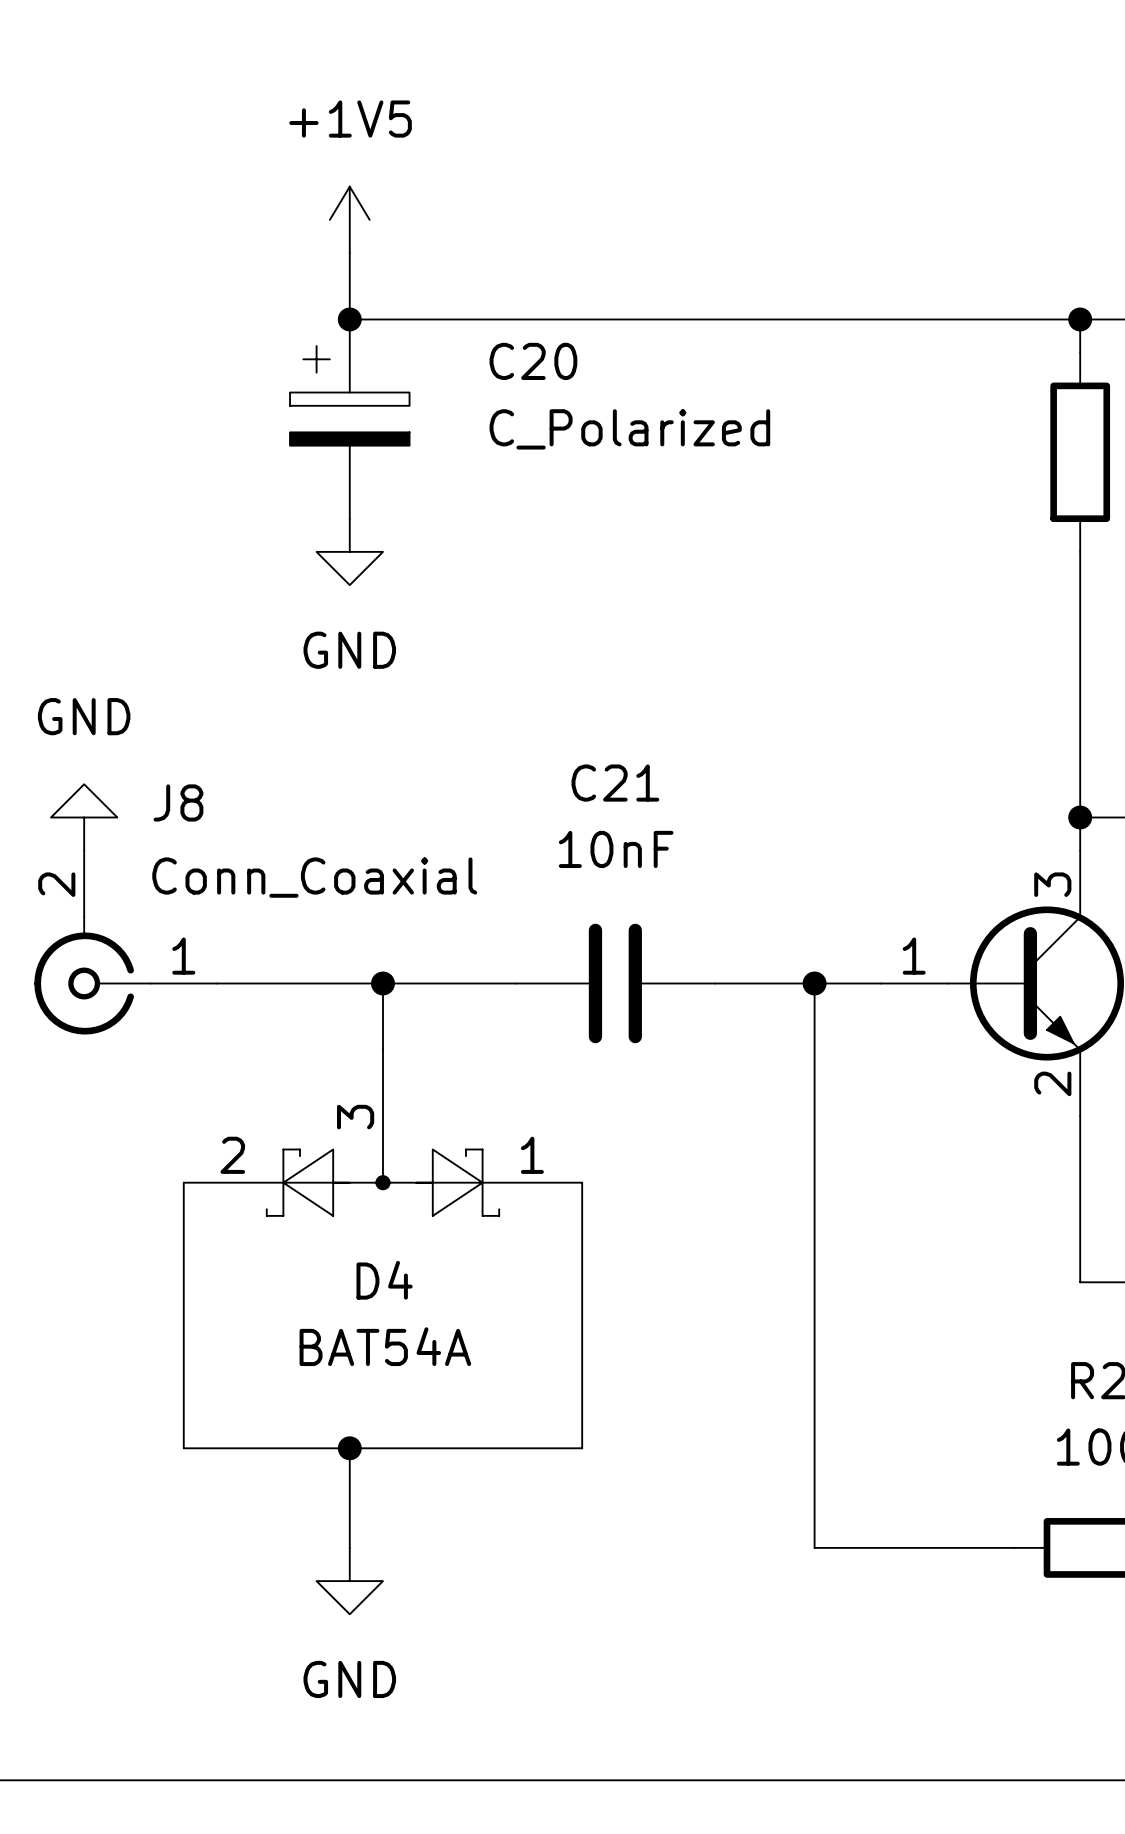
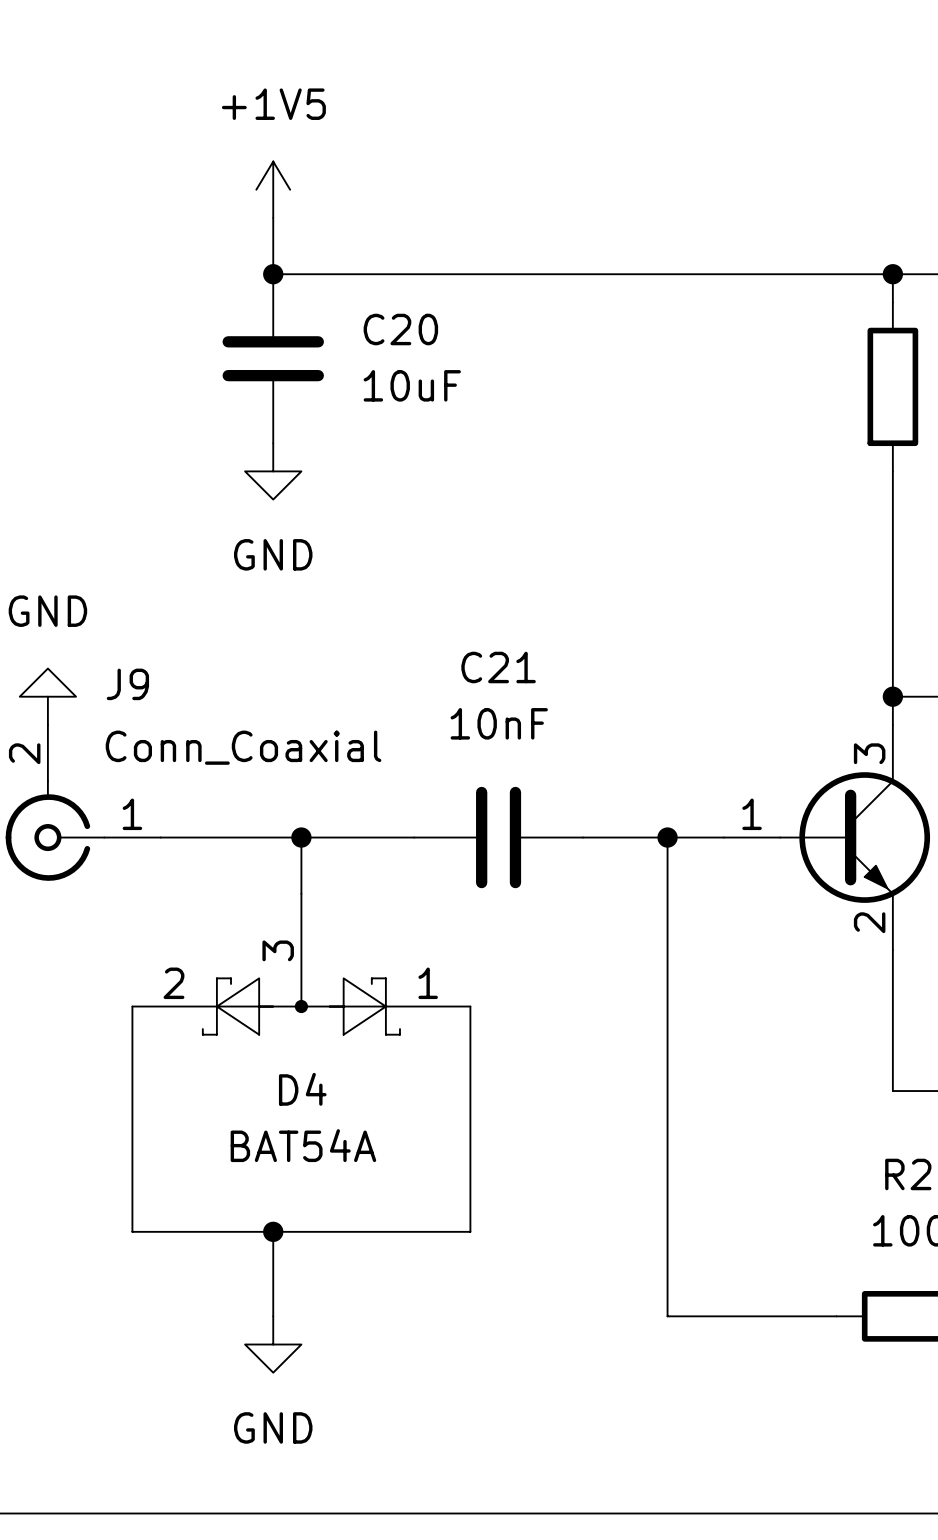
C20 symbol: [290, 319, 410, 519] -> [222, 274, 324, 444]
C20 value: C_Polarized (629, 429) -> 10uF (412, 385)
J8 name: J8 (178, 802) -> J9 (127, 684)

